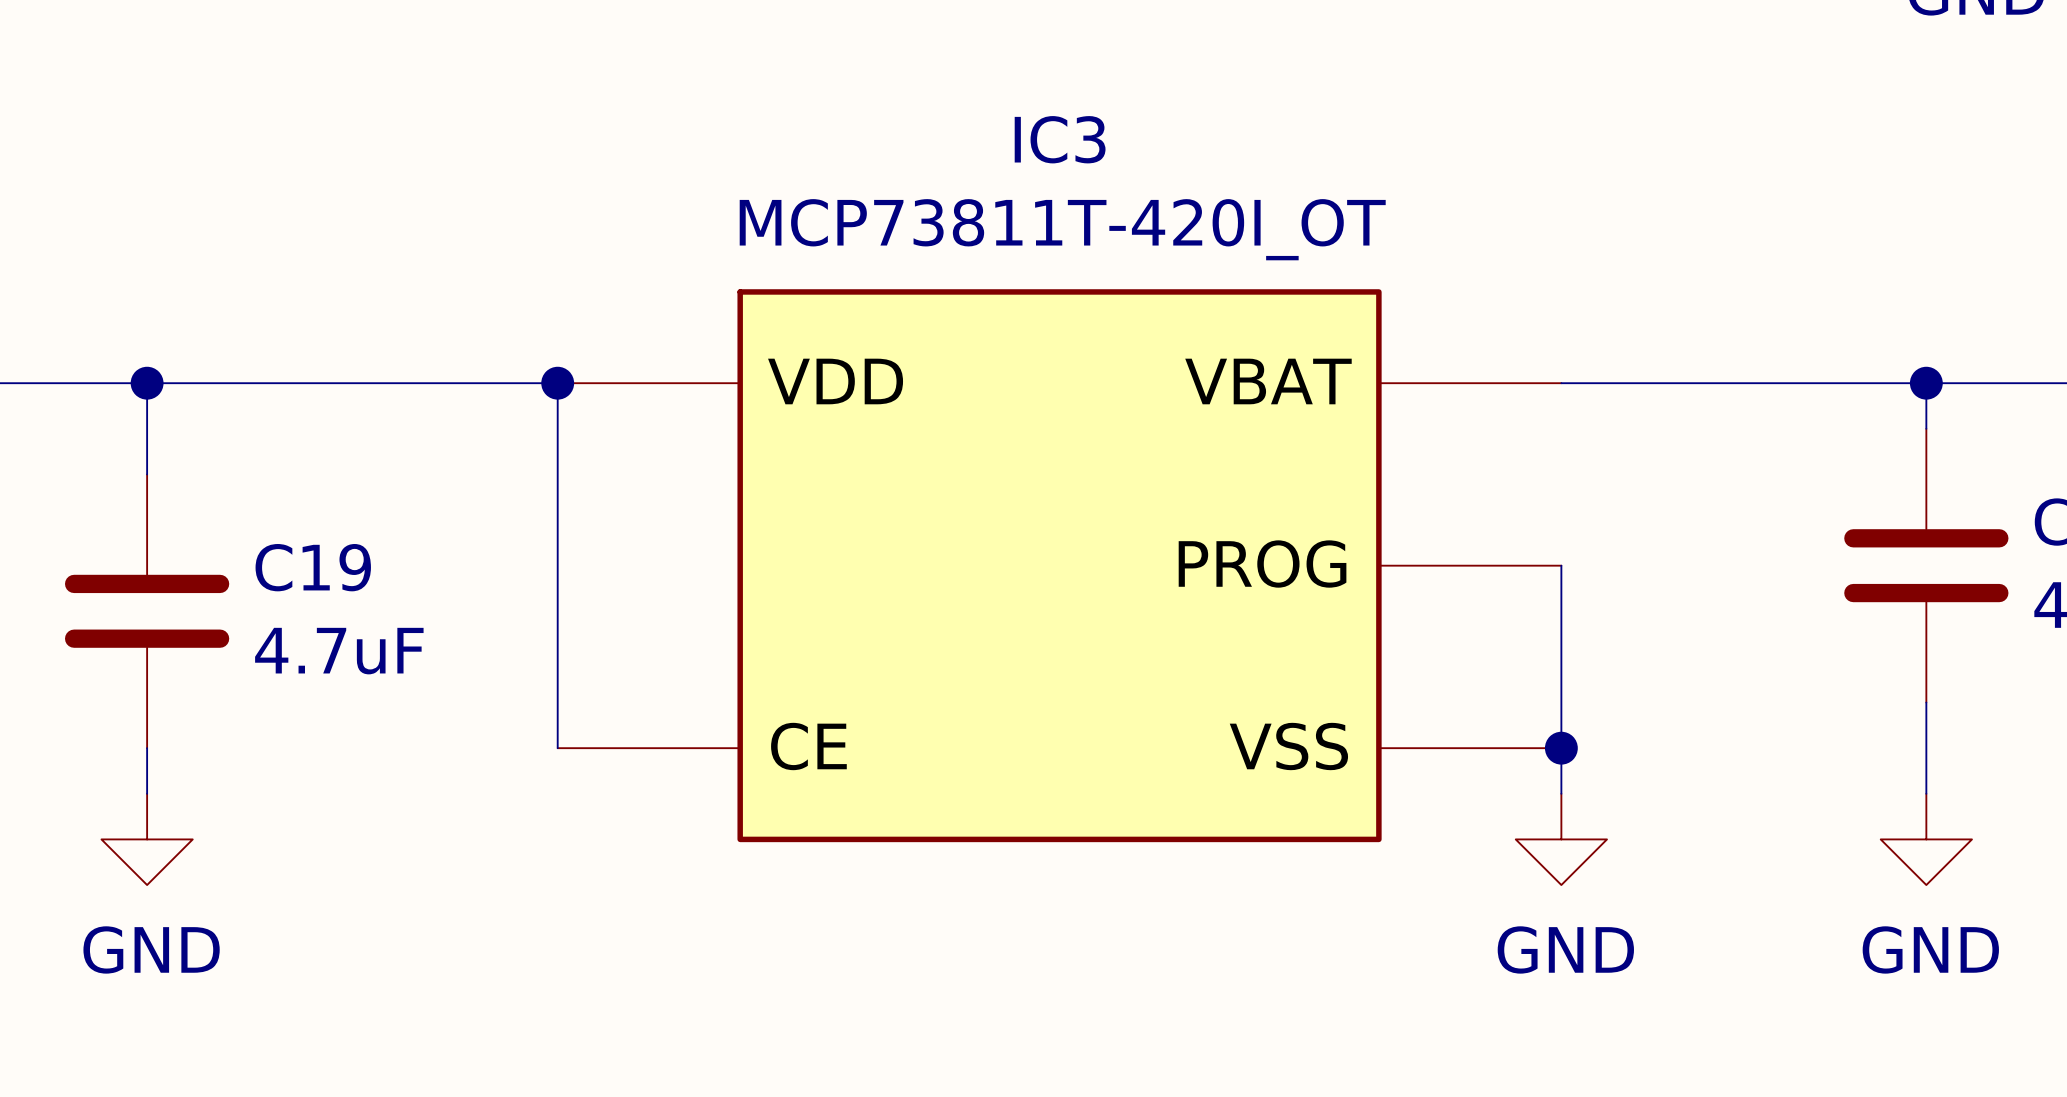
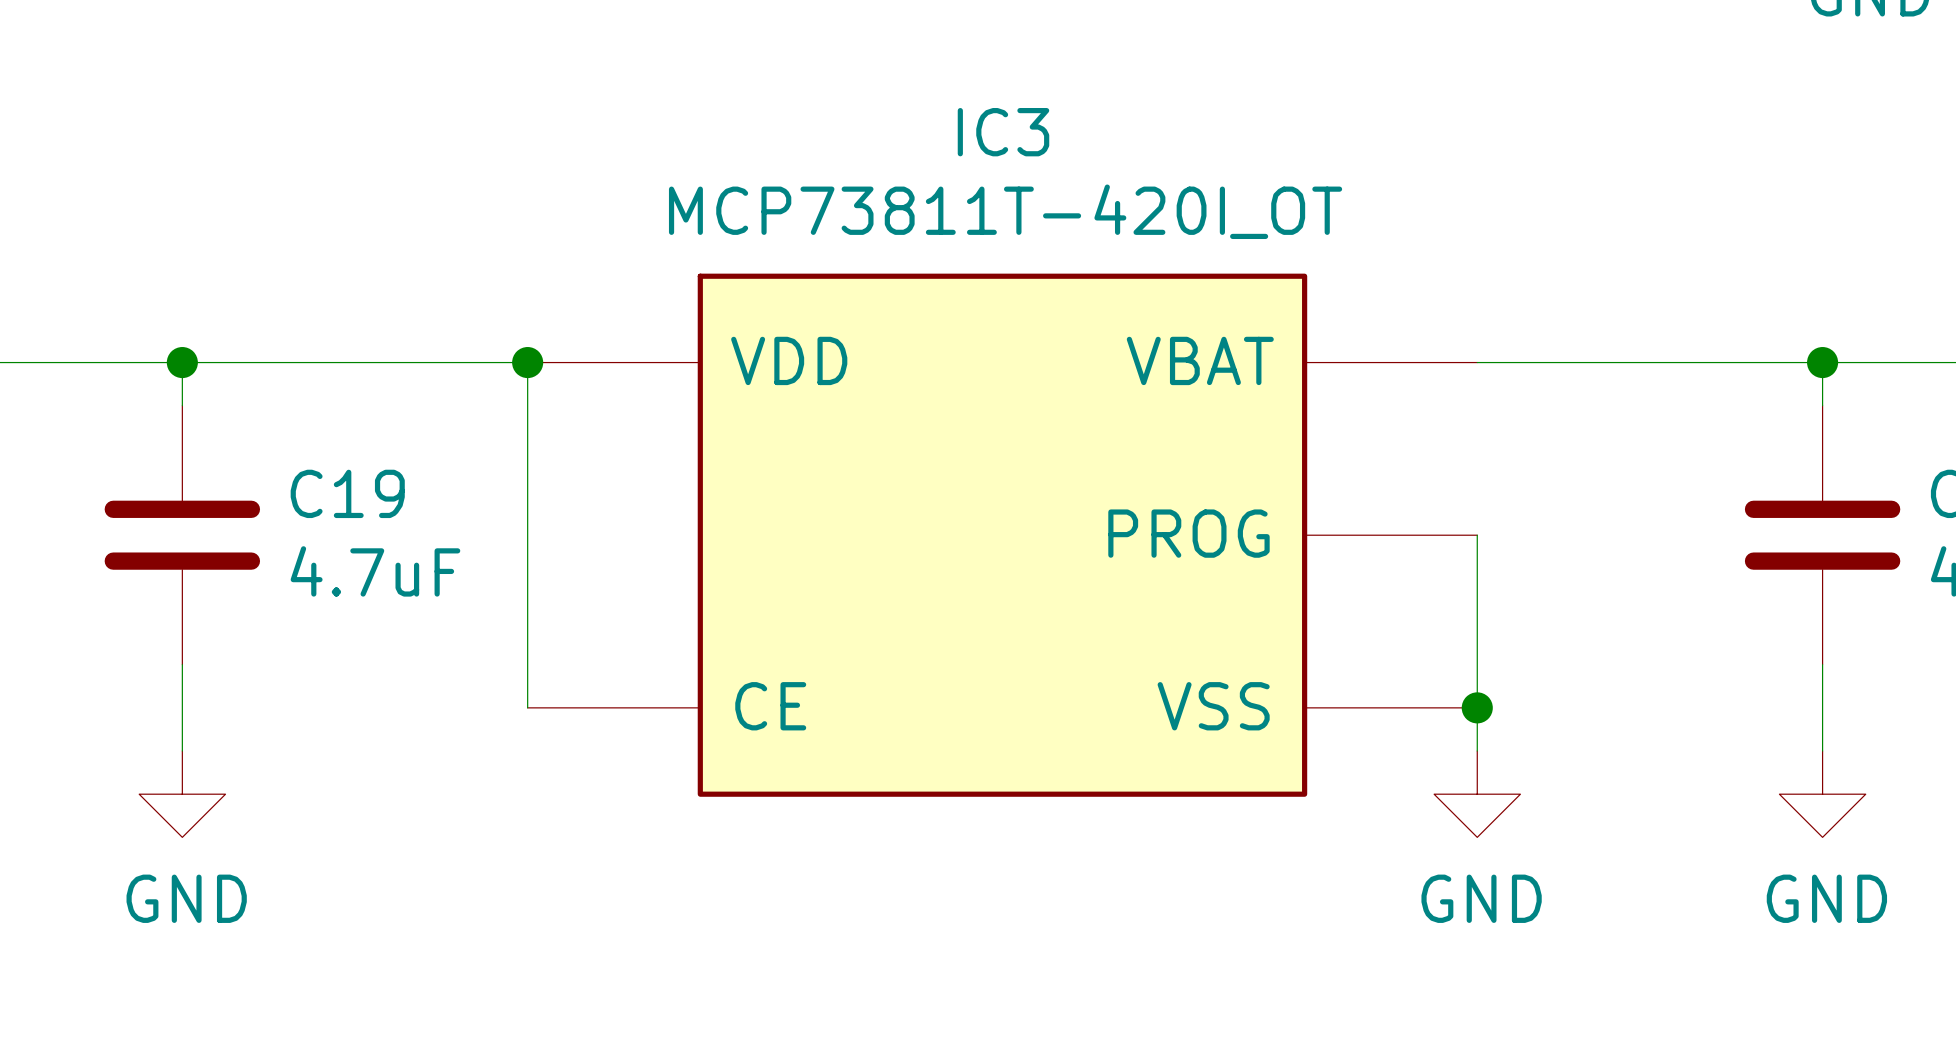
wire: (147, 383) (147, 474) -> (182, 664) (182, 751)
junction position: (147, 383) -> (182, 362)
C19 position: (147, 611) -> (182, 535)
wire: (147, 748) (147, 793) -> (182, 362) (182, 405)
power symbol position: GND (147, 839) -> GND (182, 794)

